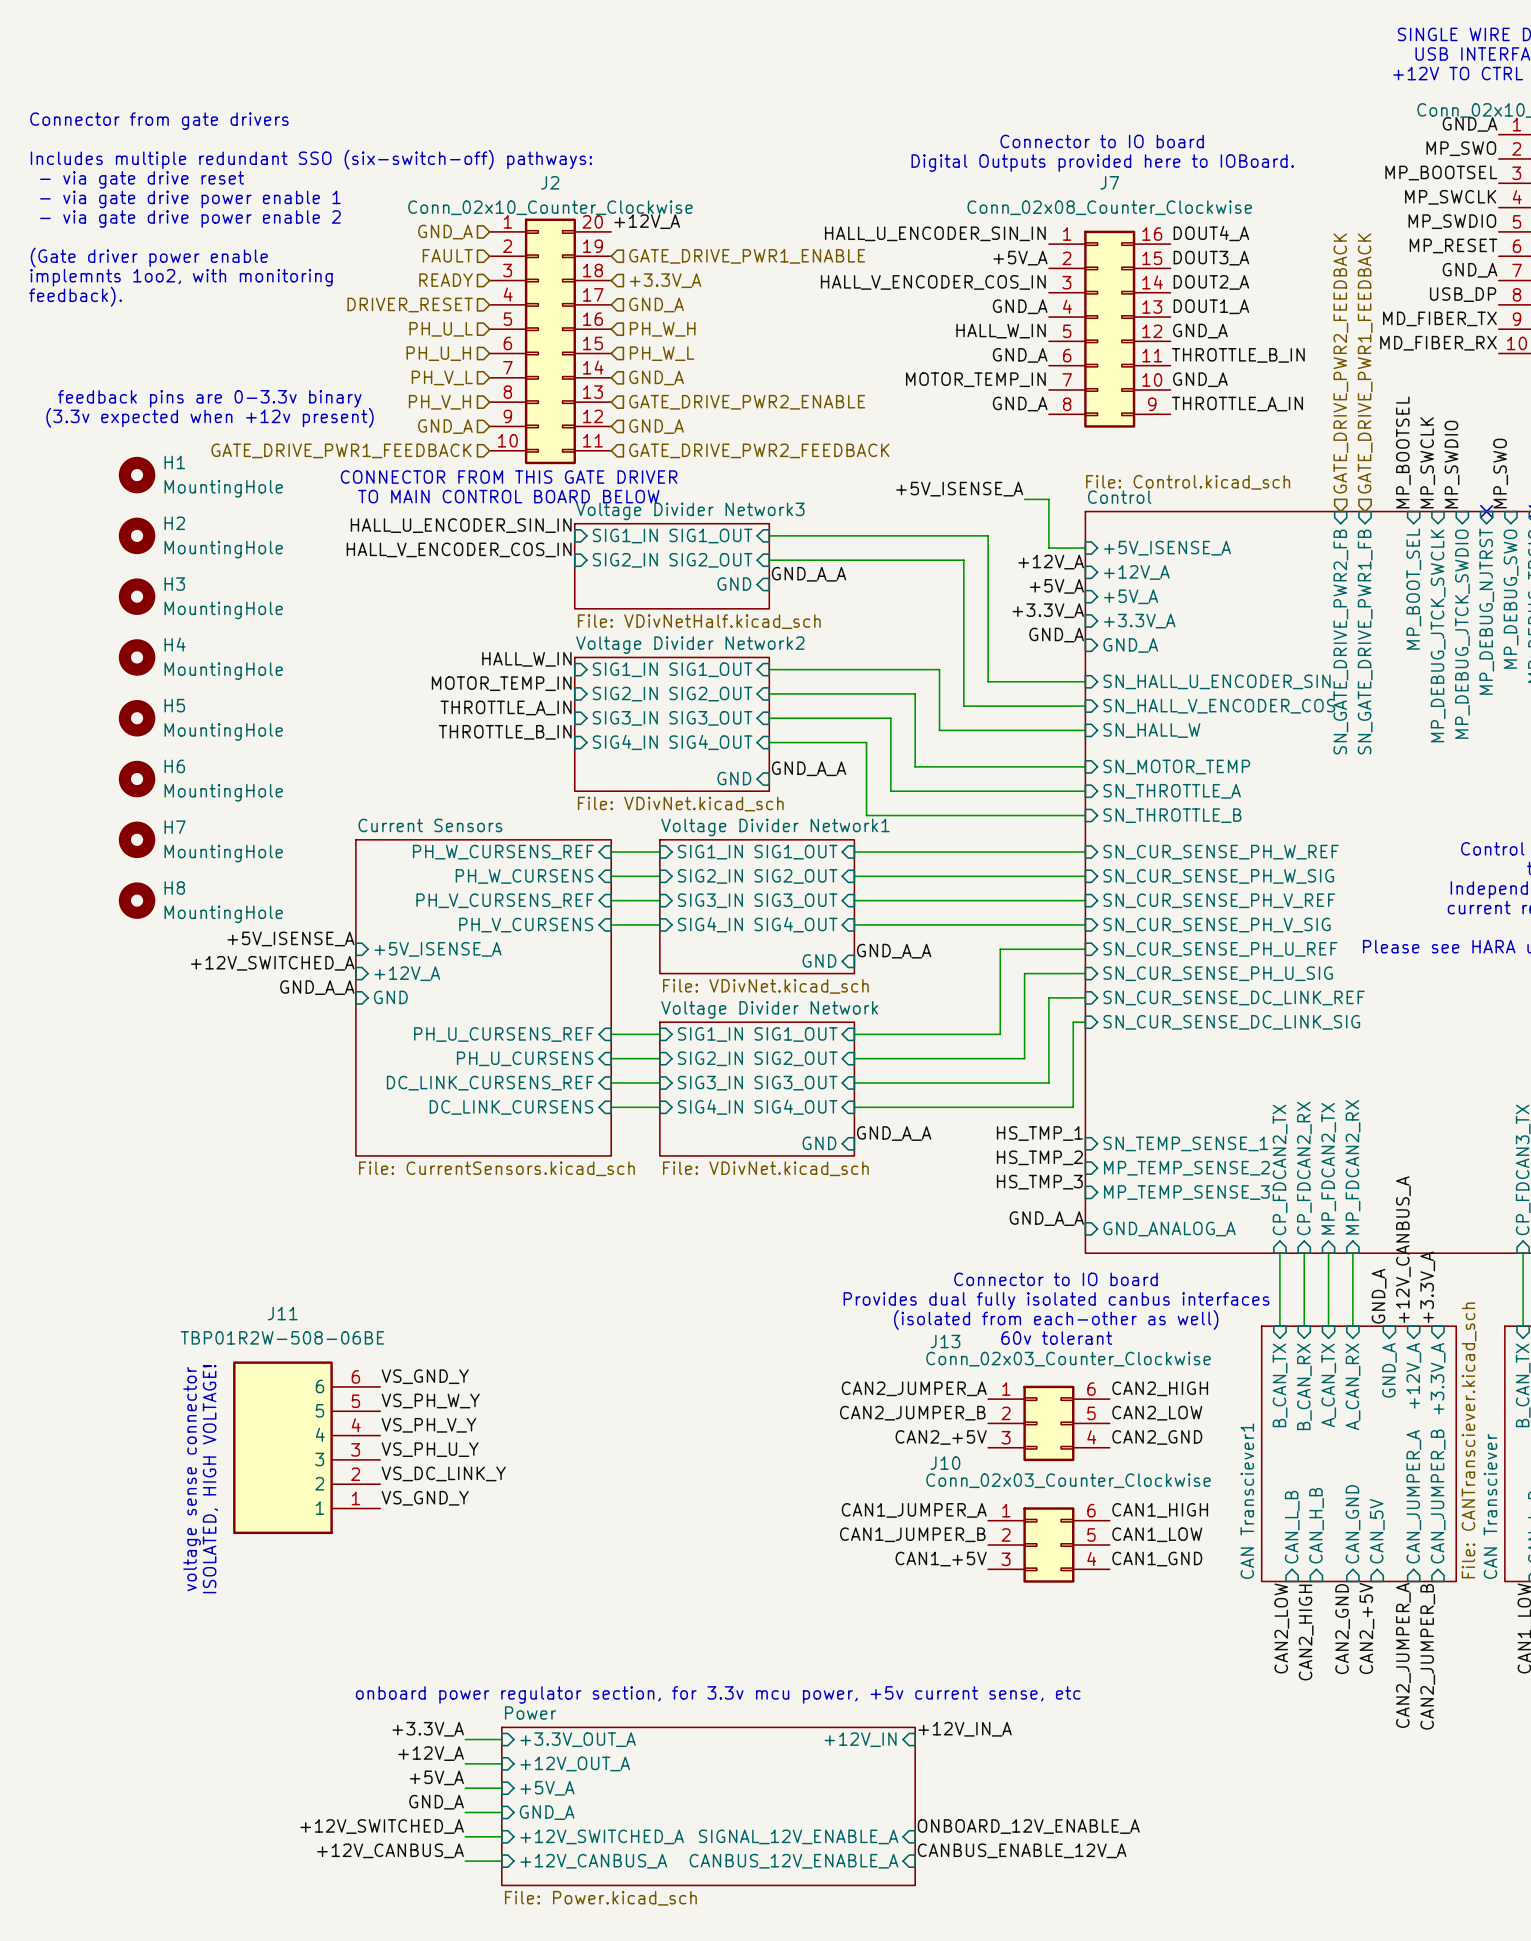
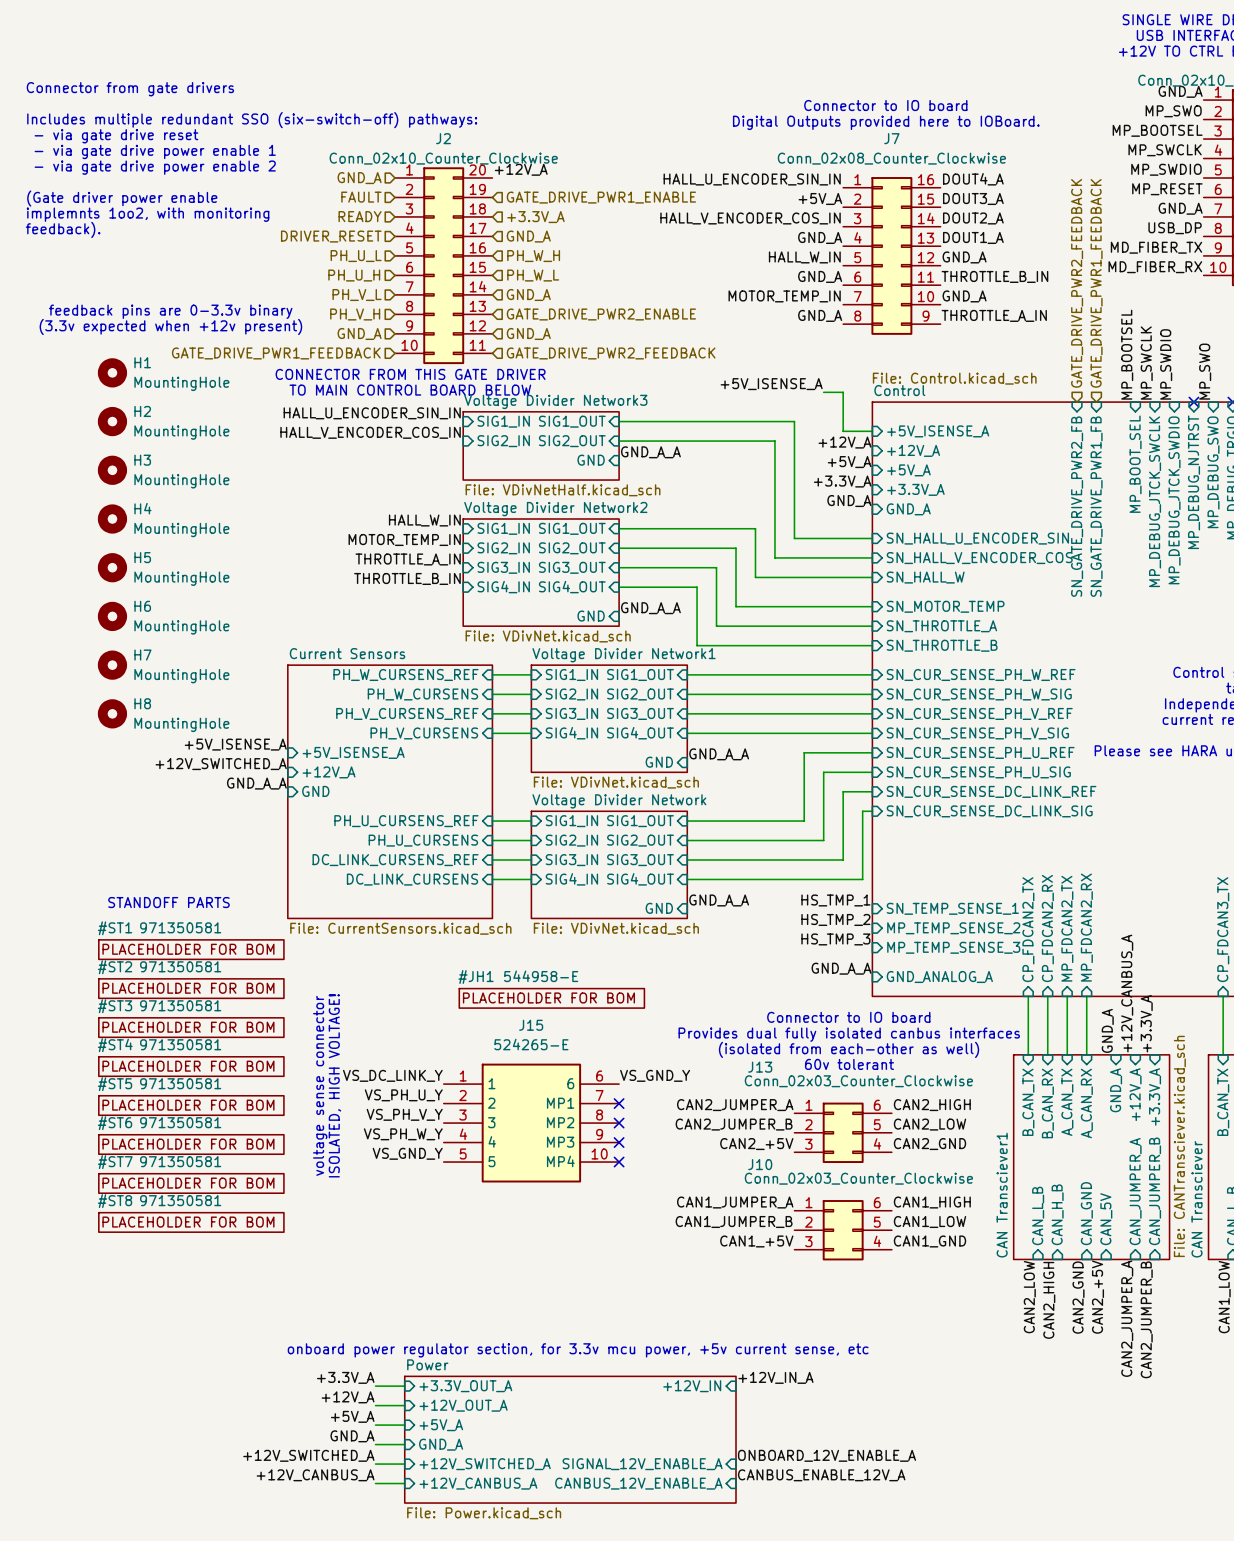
text: none -> STANDOFF PARTS (168, 902)
#ST1: none -> 971350581 (191, 949)
#ST2: none -> 971350581 (191, 988)
#JH1: none -> 544958-E (551, 998)
#ST3: none -> 971350581 (191, 1027)
#ST4: none -> 971350581 (191, 1066)
label: none -> VS_GND_Y (655, 1075)
label: VS_GND_Y (425, 1376) -> none
no-connect mark: none -> (619, 1103)
#ST5: none -> 971350581 (191, 1105)
label position: VS_PH_W_Y (430, 1401) -> VS_PH_W_Y (403, 1134)
J15: none -> 524265-E (531, 1123)
no-connect mark: none -> (619, 1123)
label position: VS_PH_V_Y (428, 1425) -> VS_PH_V_Y (404, 1114)
no-connect mark: none -> (619, 1142)
#ST6: none -> 971350581 (191, 1144)
J11: TBP01R2W-508-06BE (306, 1447) -> none
label position: VS_PH_U_Y (430, 1449) -> VS_PH_U_Y (403, 1095)
label: none -> VS_GND_Y (407, 1153)
no-connect mark: none -> (619, 1162)
label position: VS_DC_LINK_Y (443, 1473) -> VS_DC_LINK_Y (392, 1075)
text position: voltage sense connector (192, 1479) -> voltage sense connector (320, 1085)
text position: ISOLATED, HIGH VOLTAGE! (210, 1479) -> ISOLATED, HIGH VOLTAGE! (334, 1085)
#ST7: none -> 971350581 (191, 1183)
label: VS_GND_Y (425, 1498) -> none
#ST8: none -> 971350581 (191, 1222)

